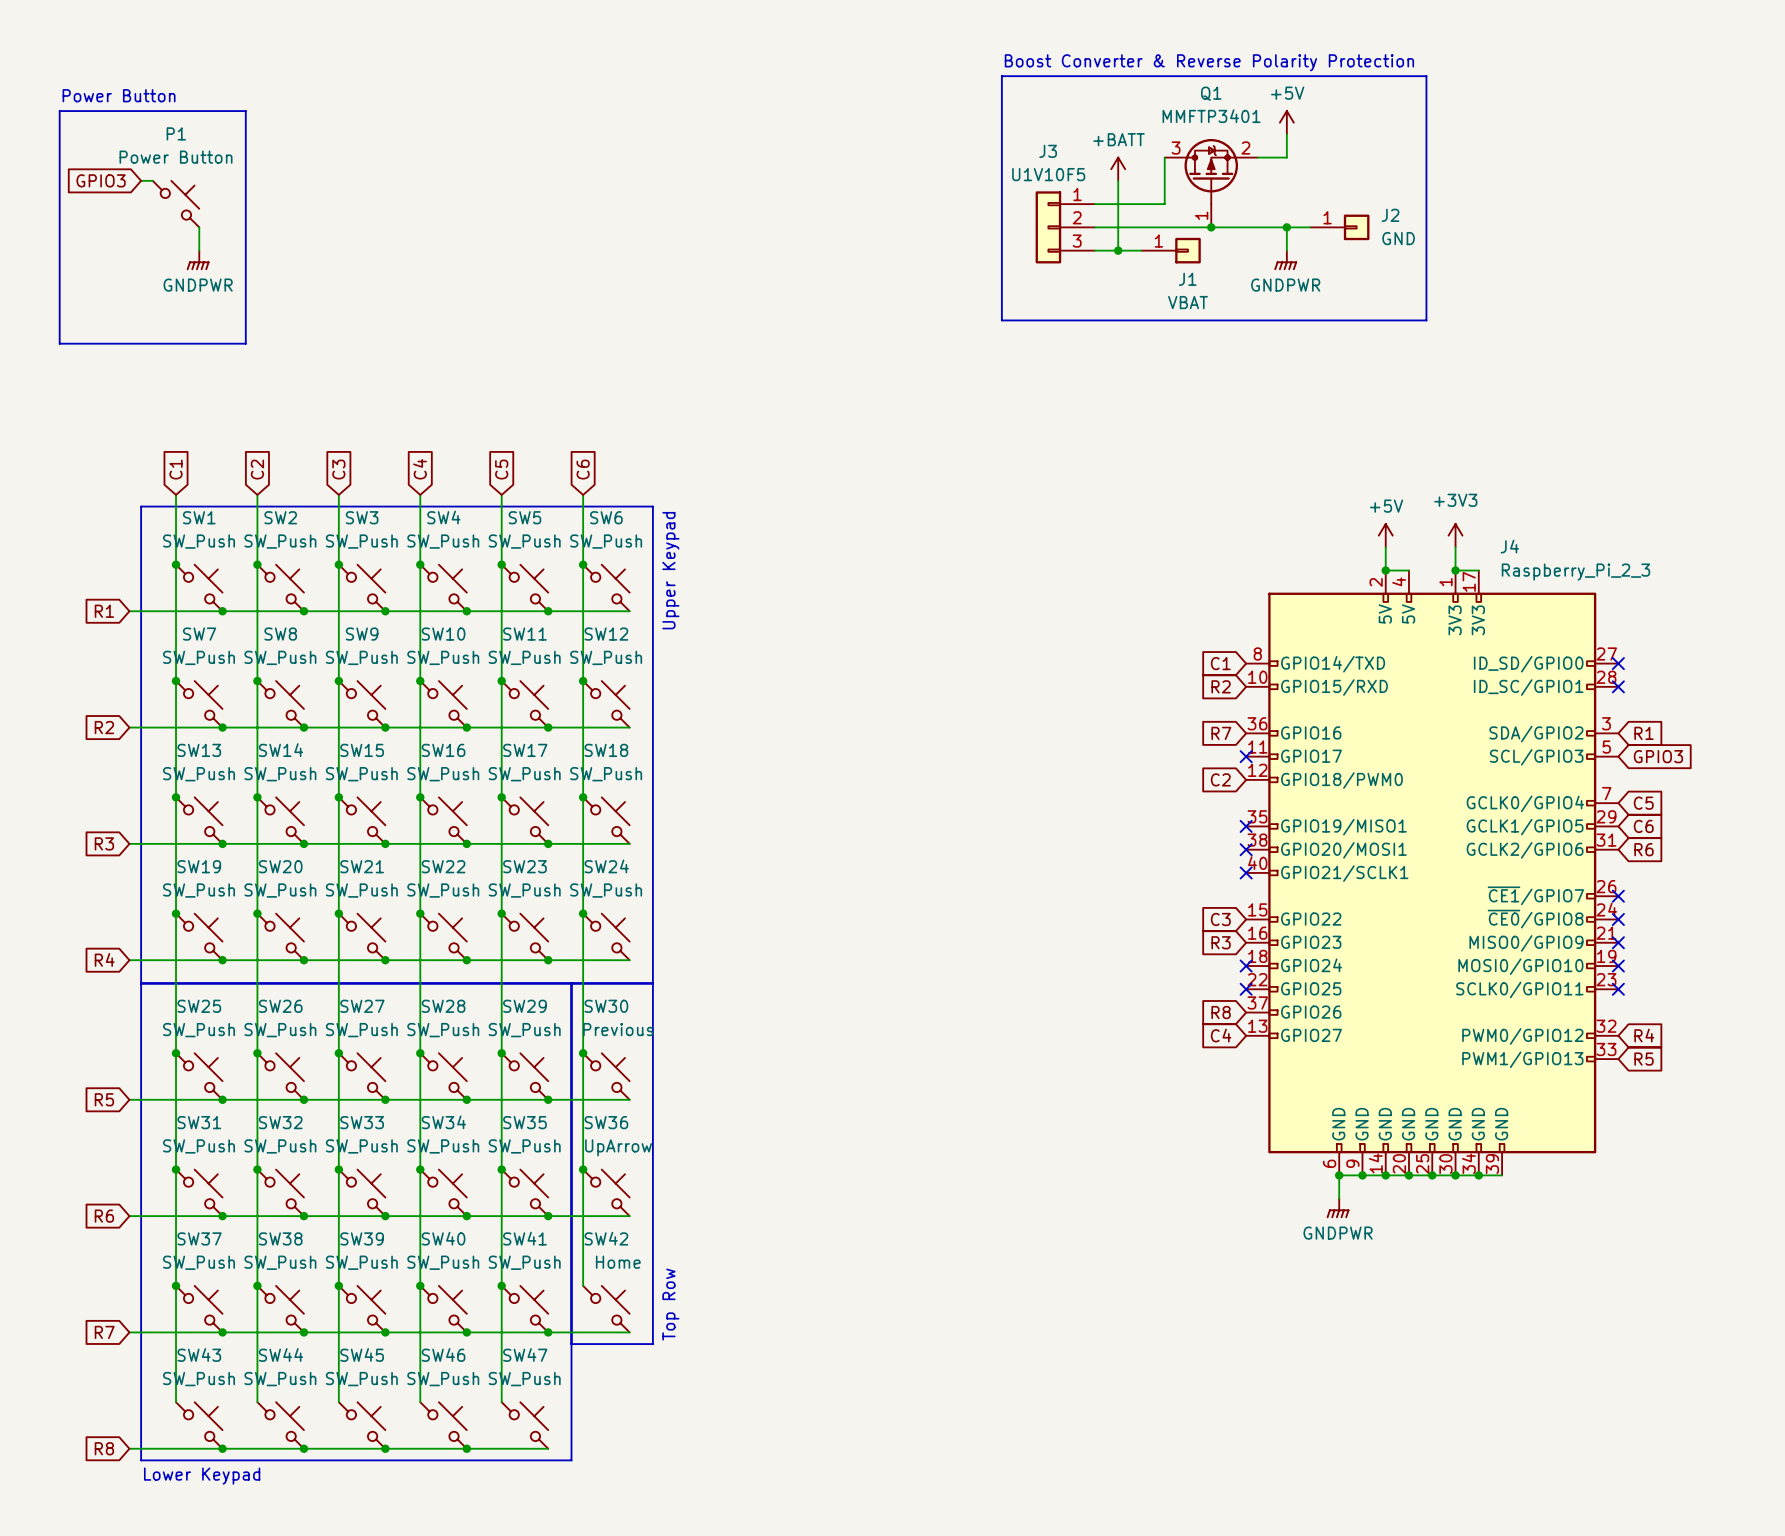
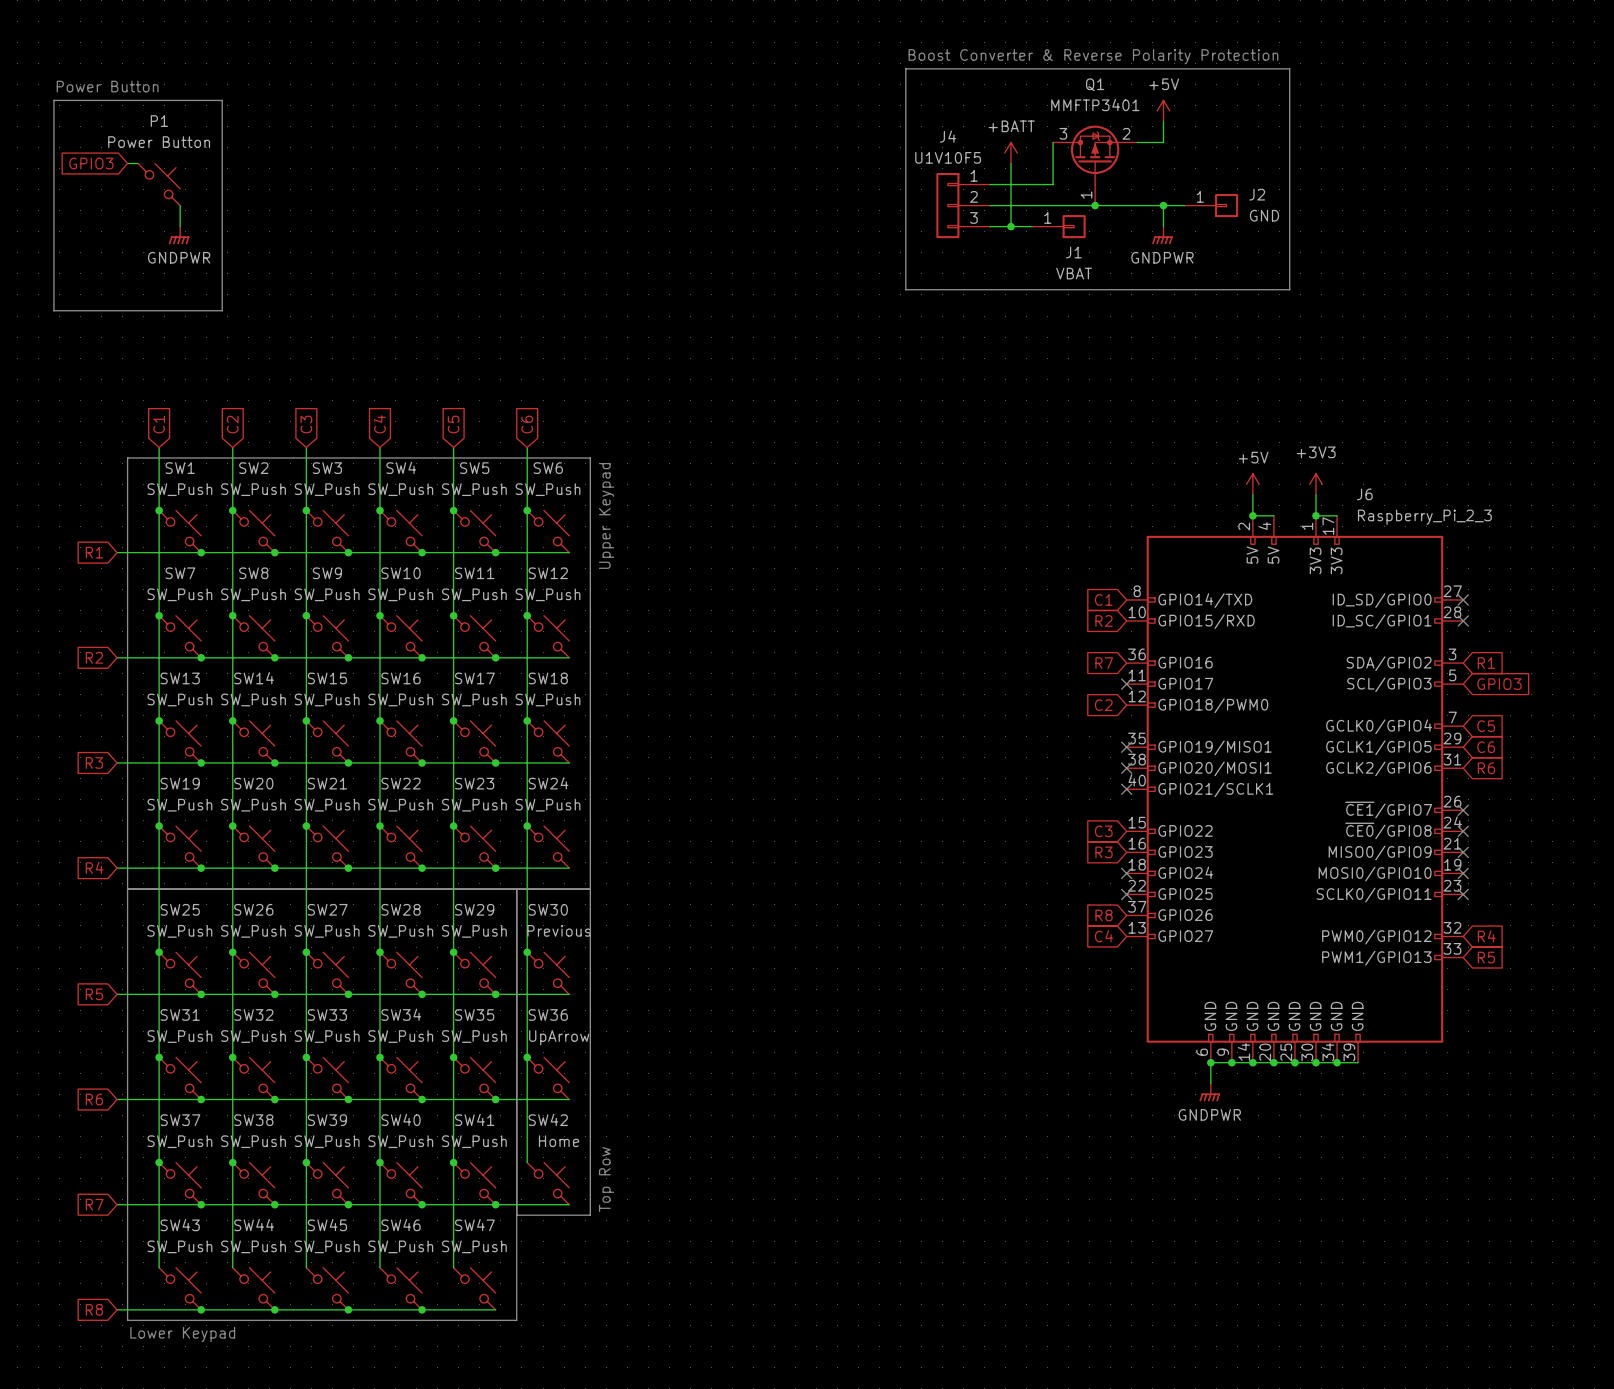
J3 name: J3 (1048, 151) -> J4 (947, 136)
J4 name: J4 (1509, 546) -> J6 (1364, 494)

